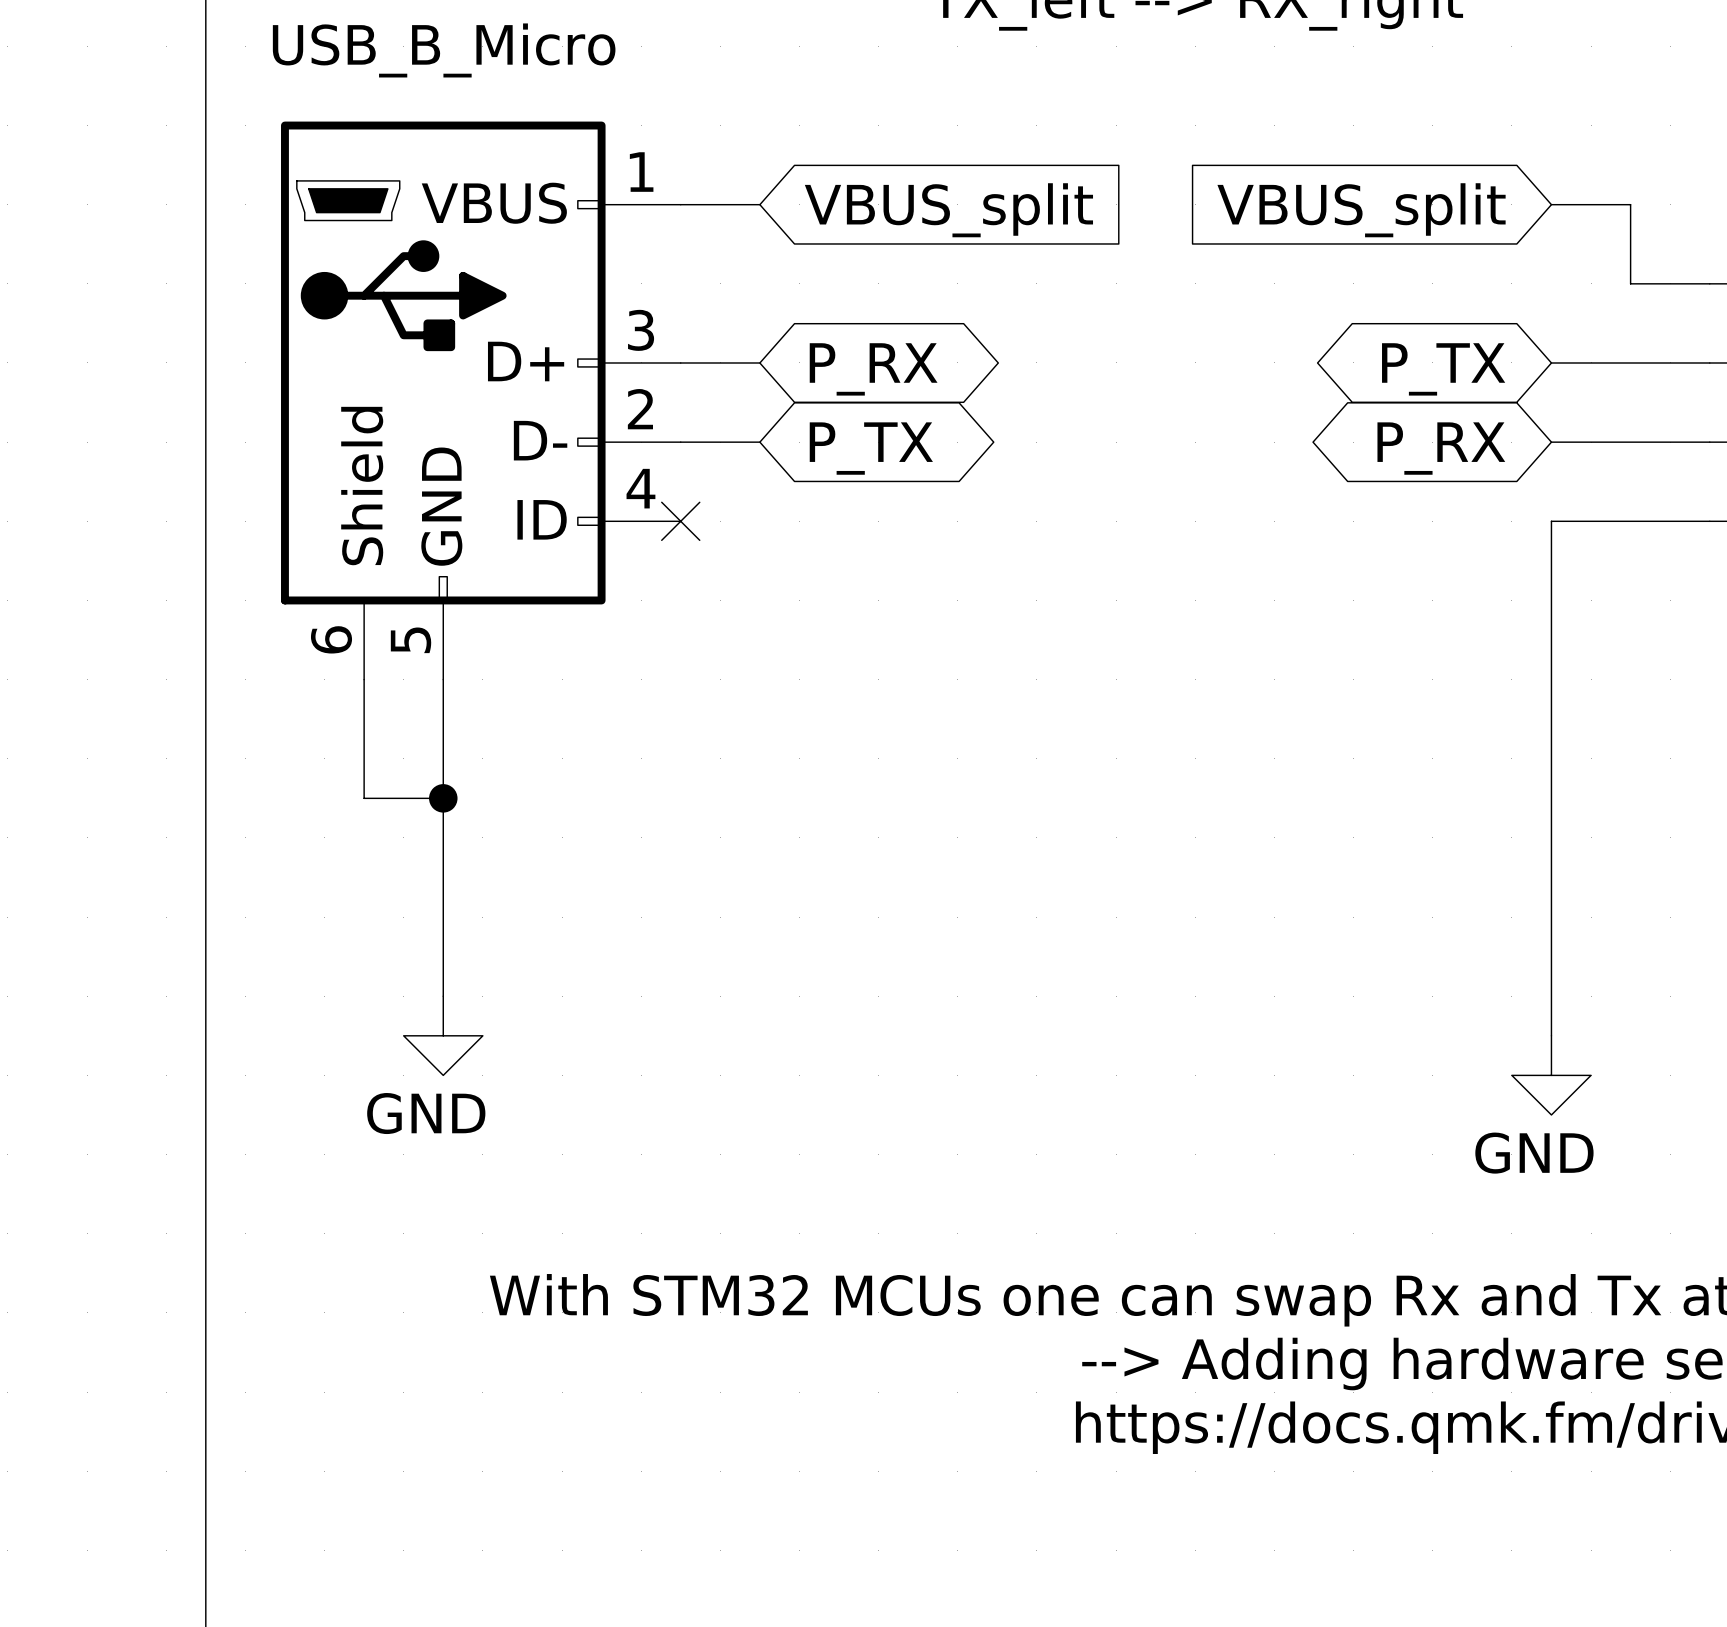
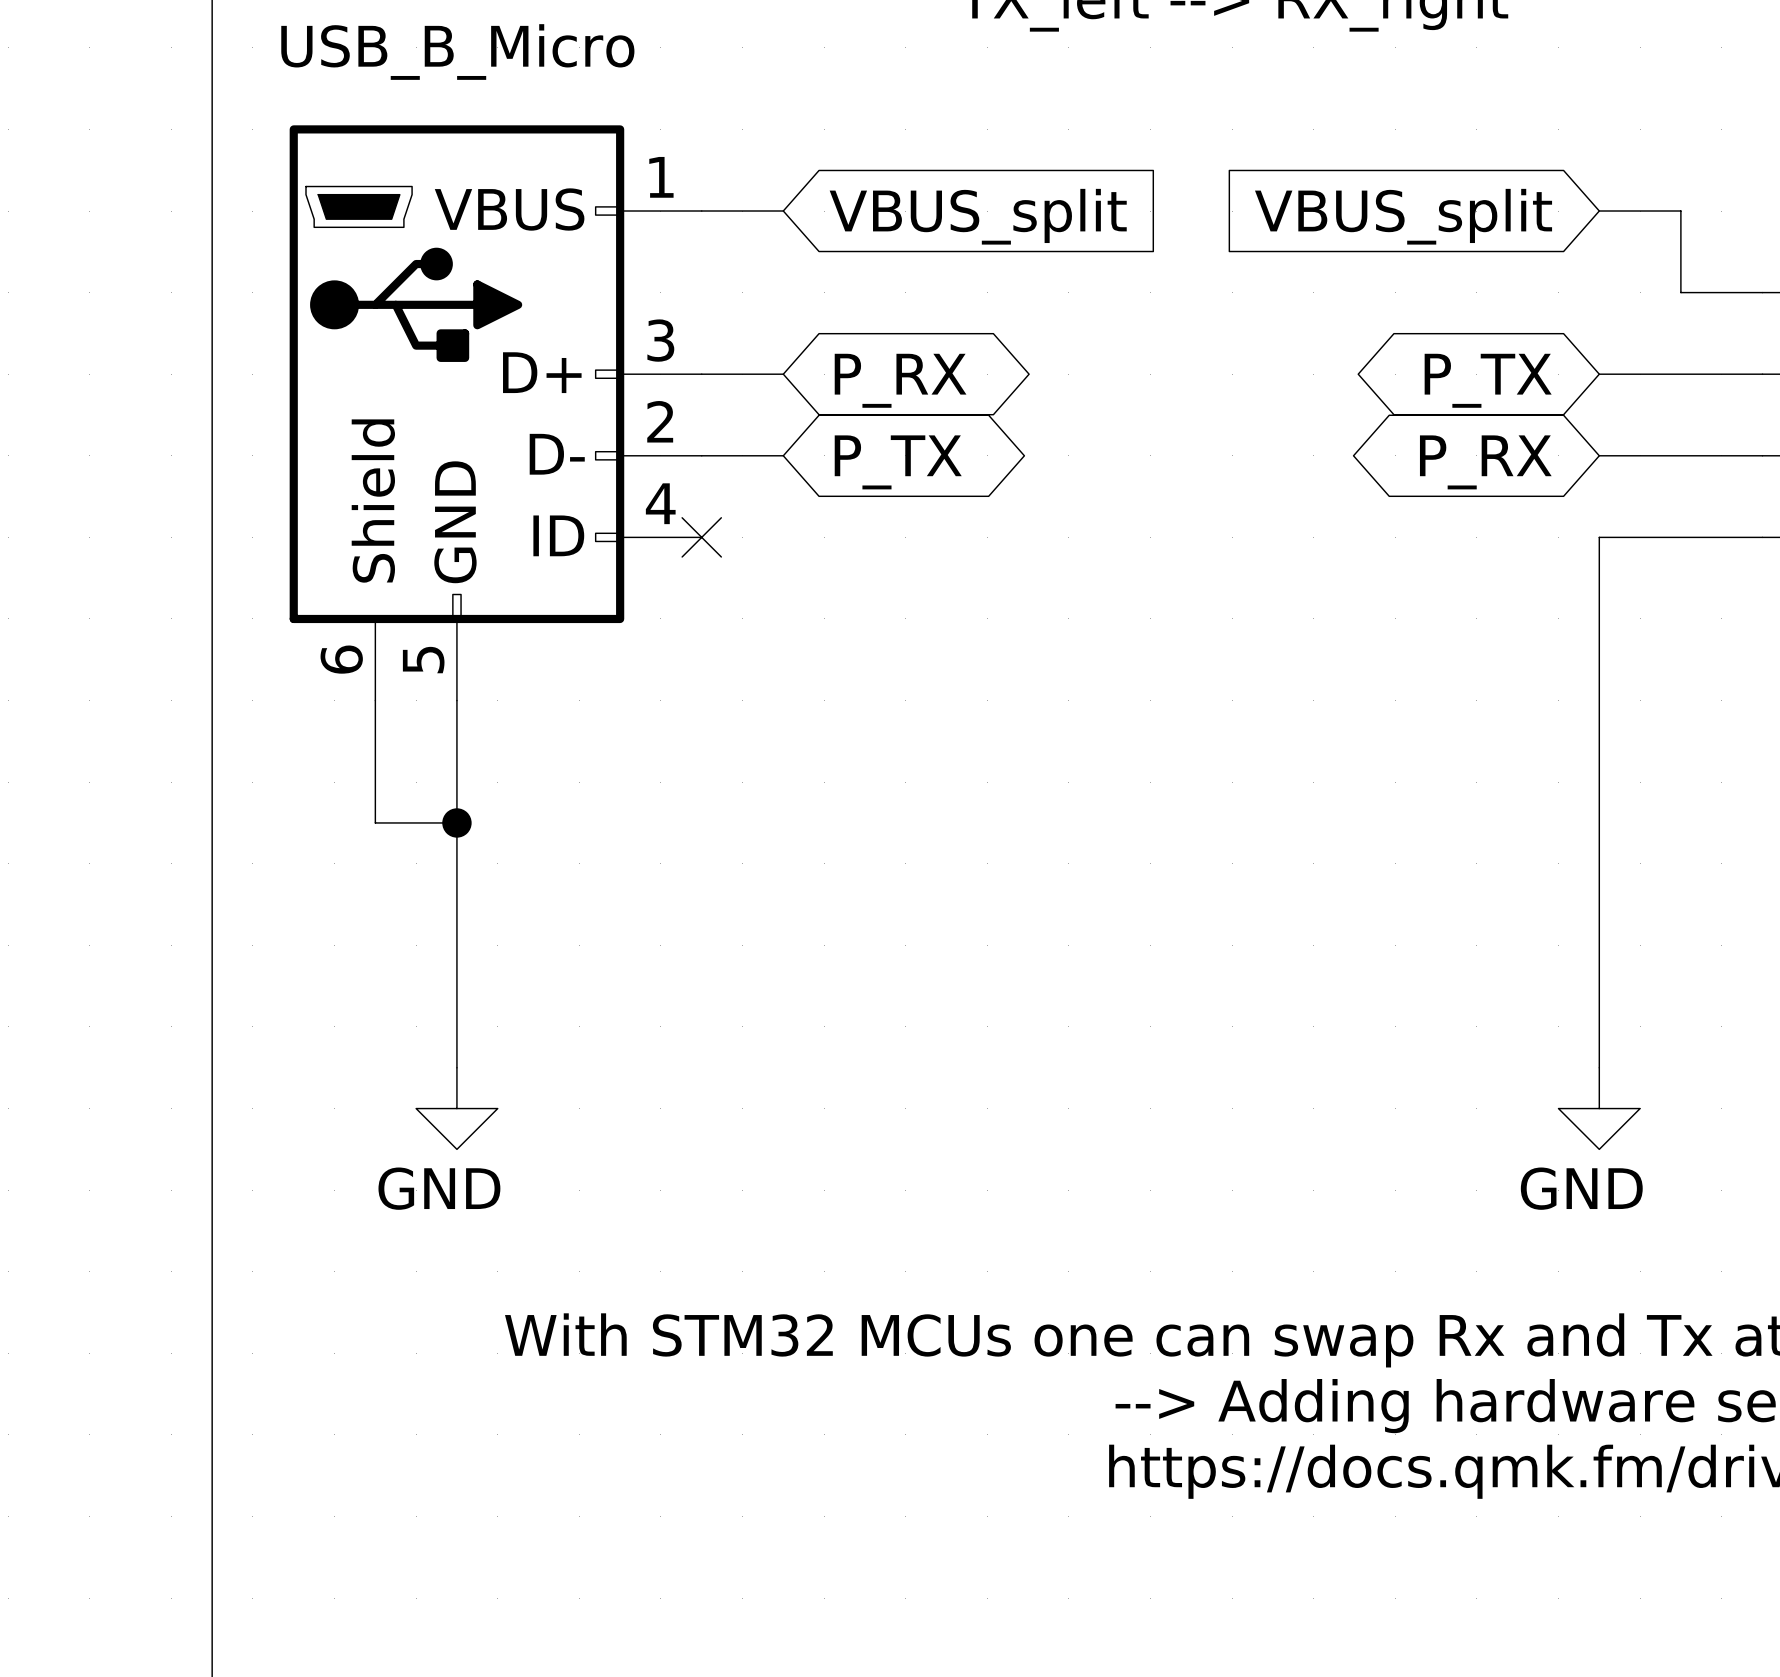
power symbol position: GND (443, 1035) -> GND (456, 1108)

